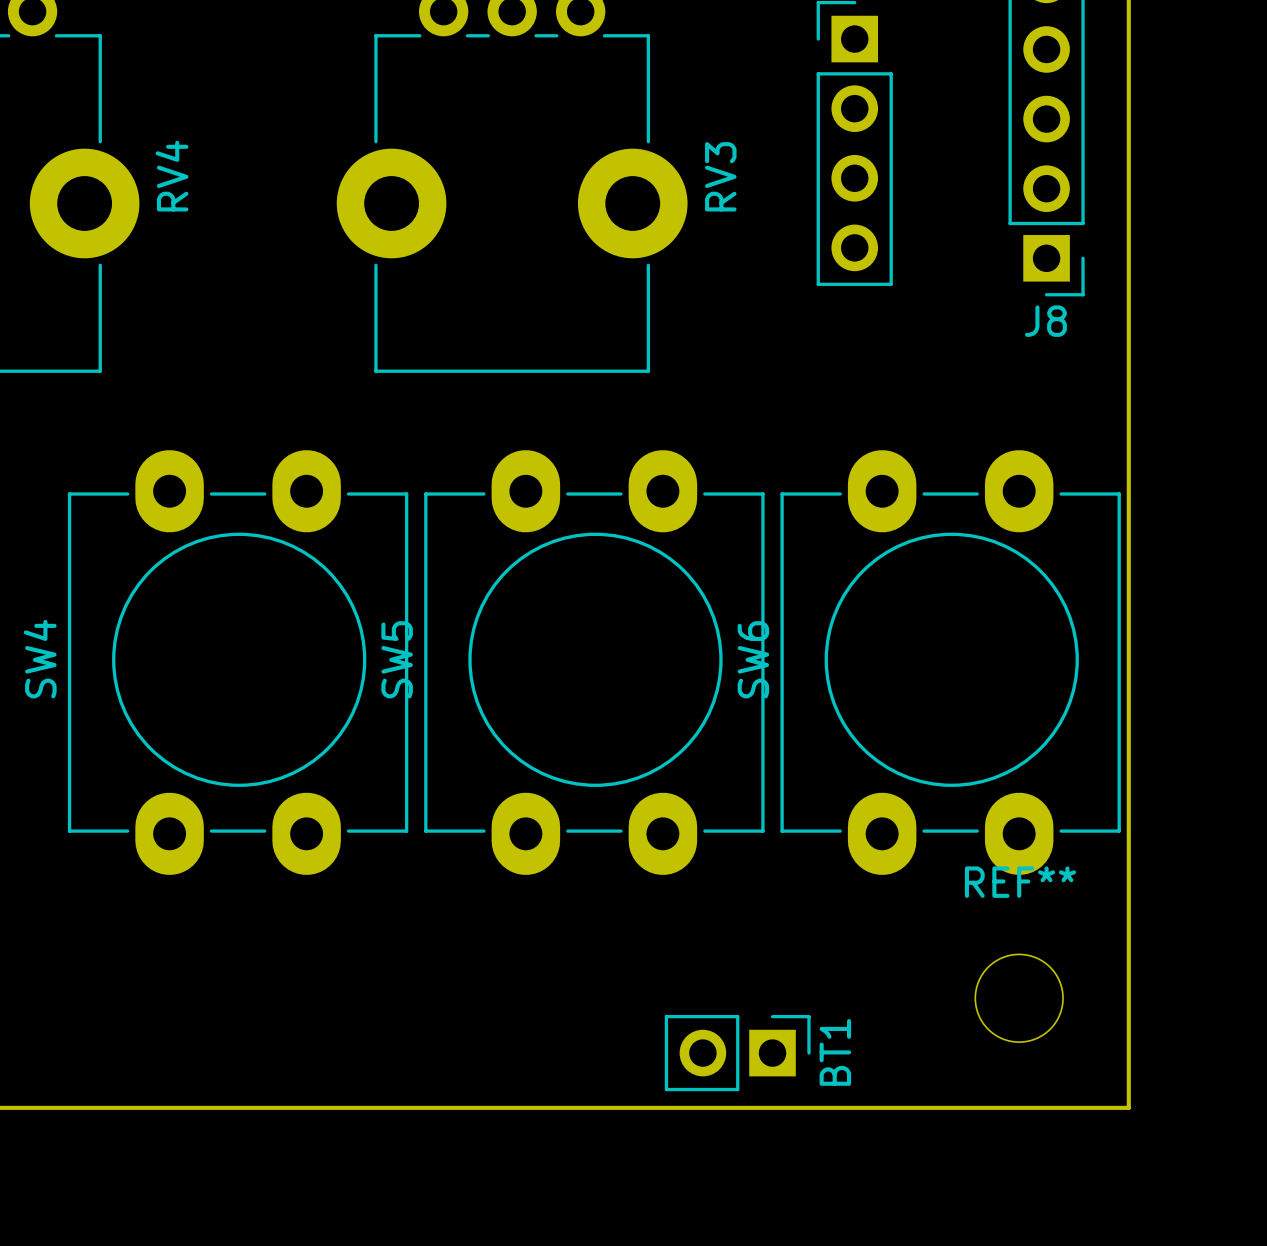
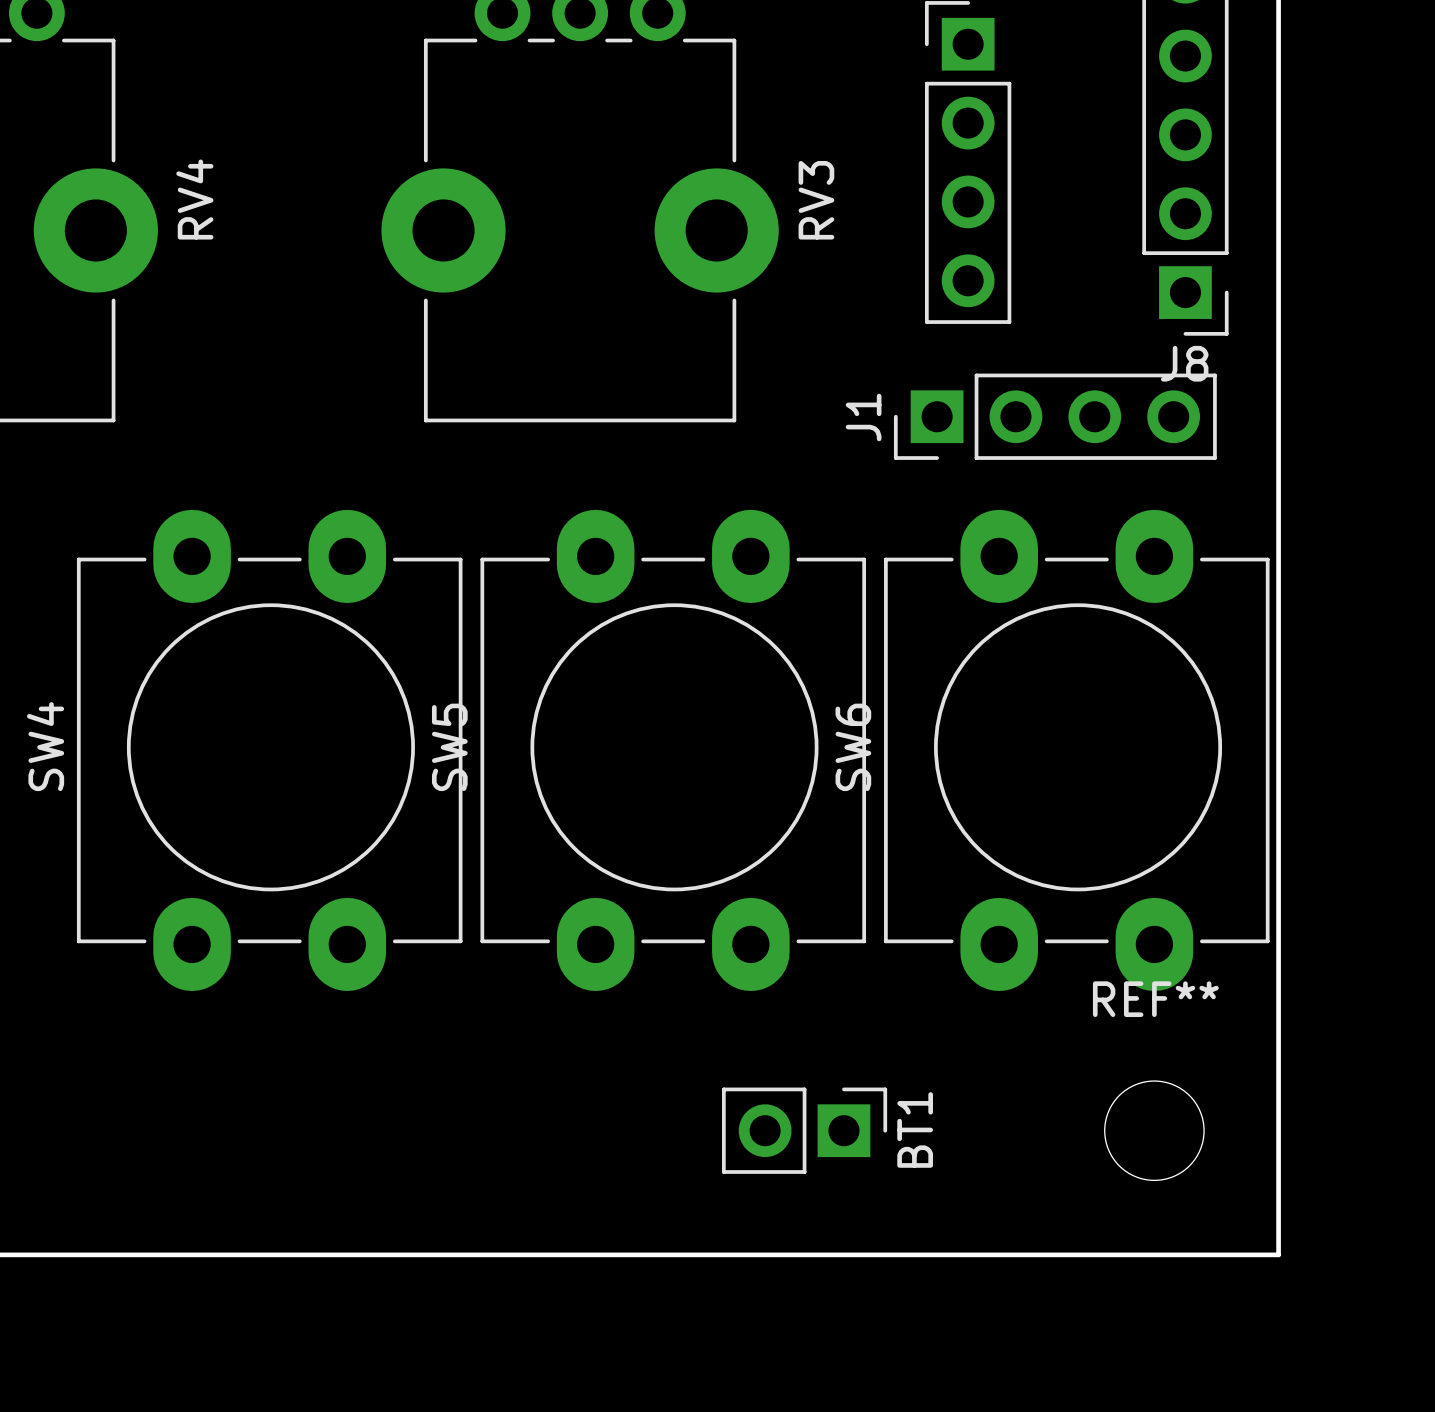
J1: none -> (1055, 416)
BT1 position: (737, 1053) -> (804, 1130)

